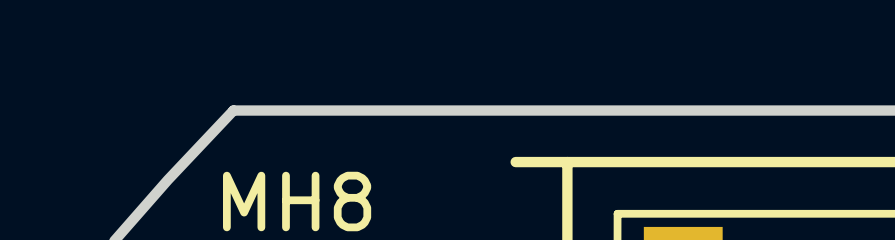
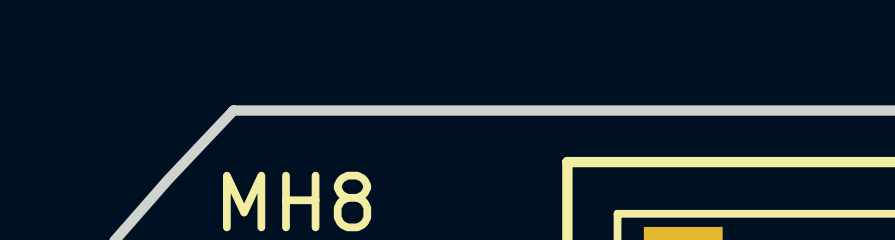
line: (515, 162) (567, 162) -> none

